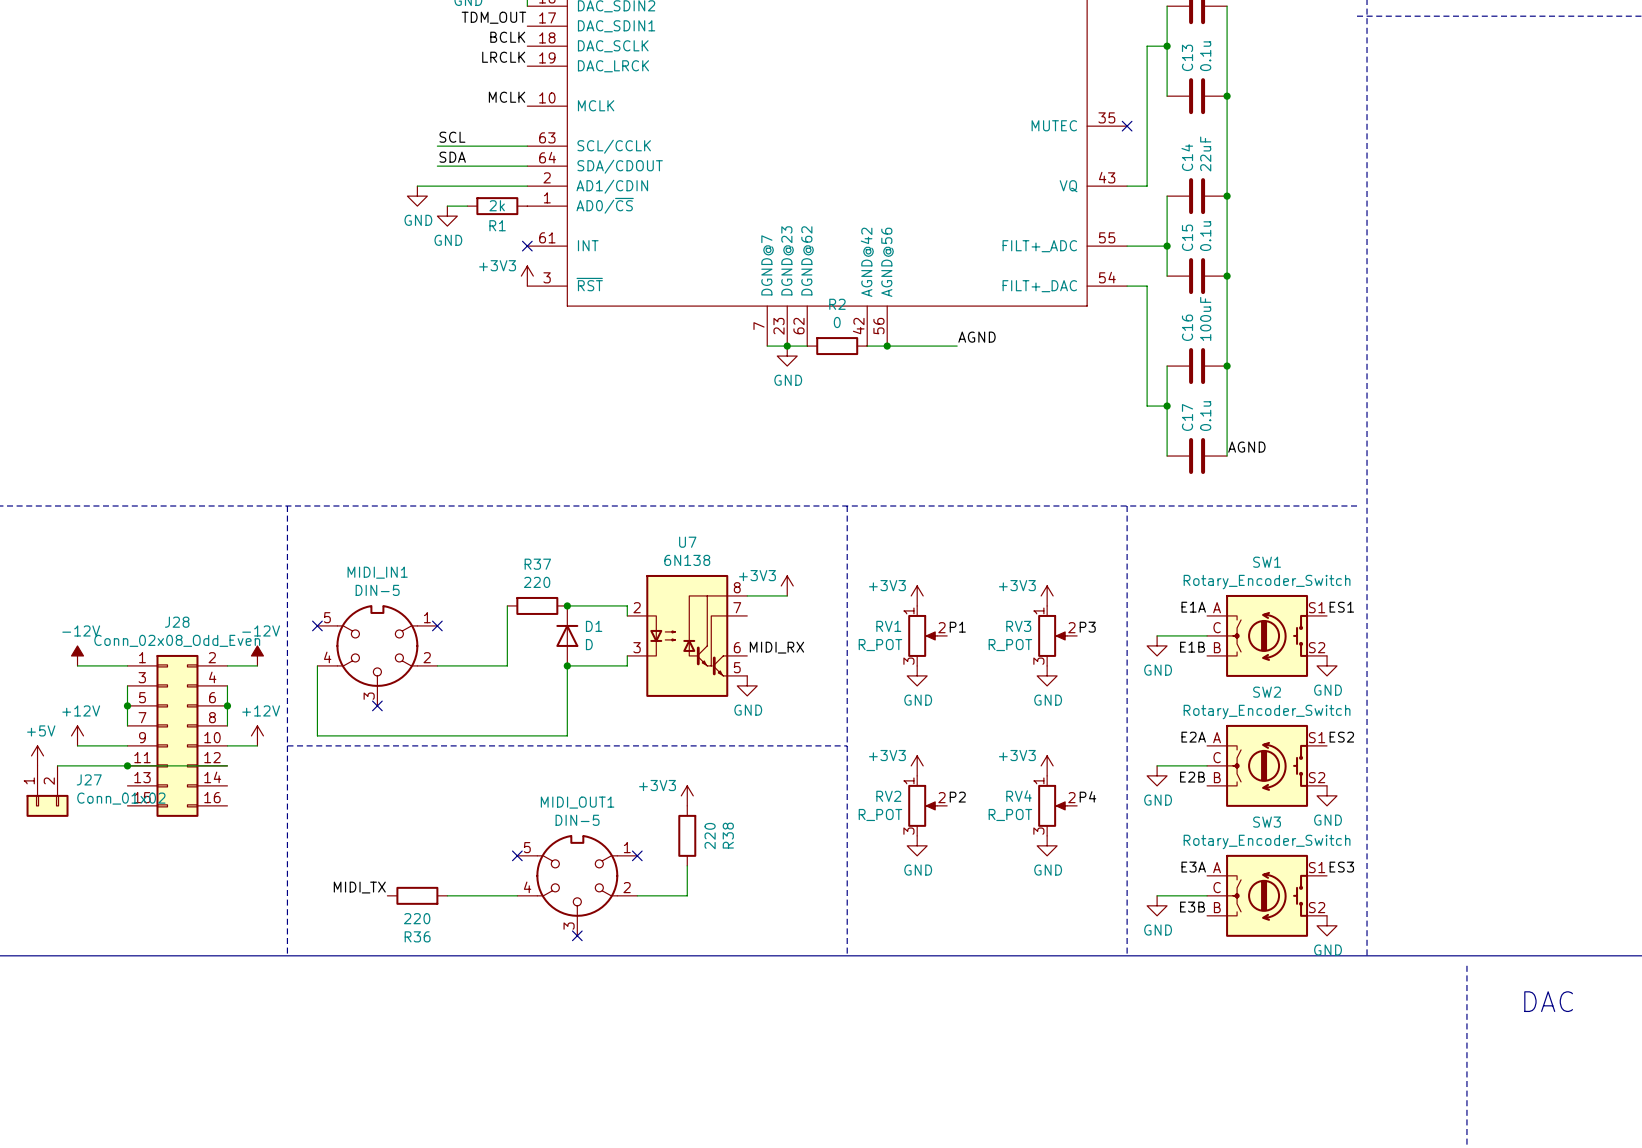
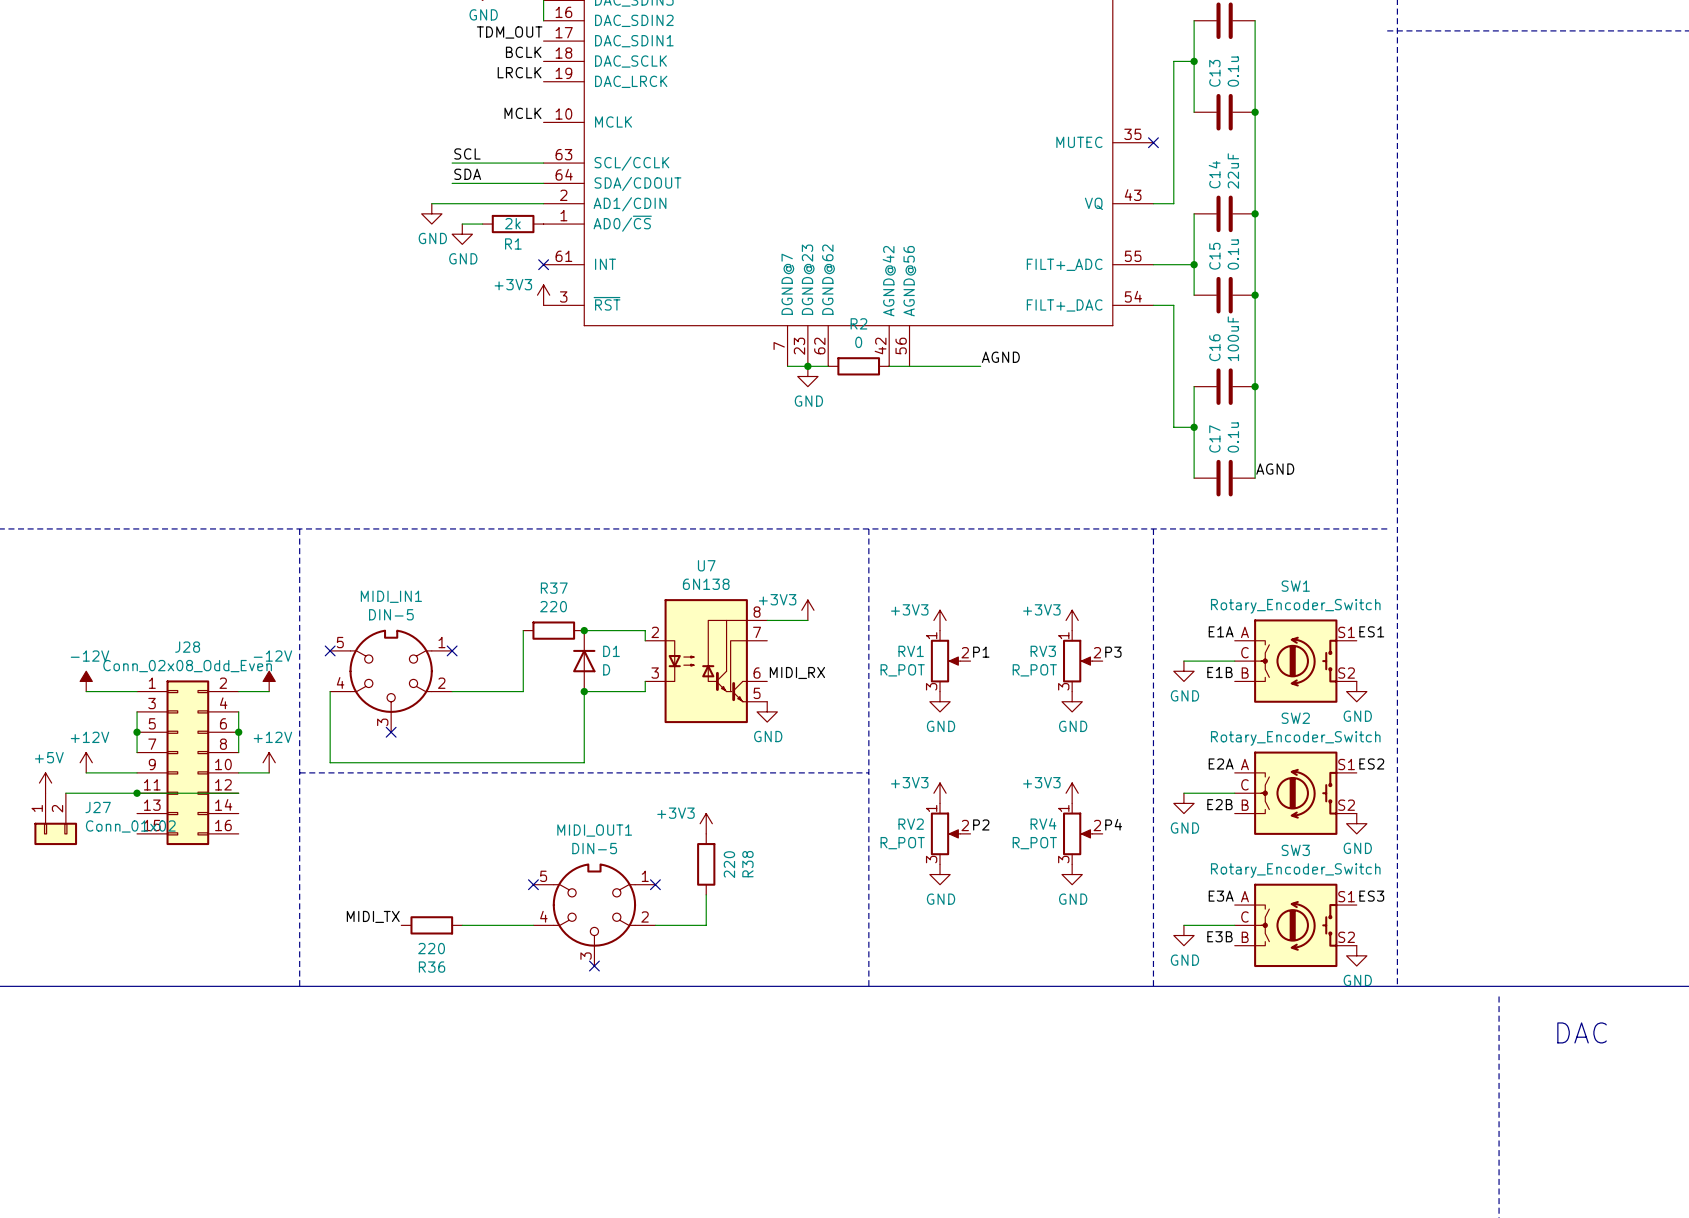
junction: (887, 346) -> none

